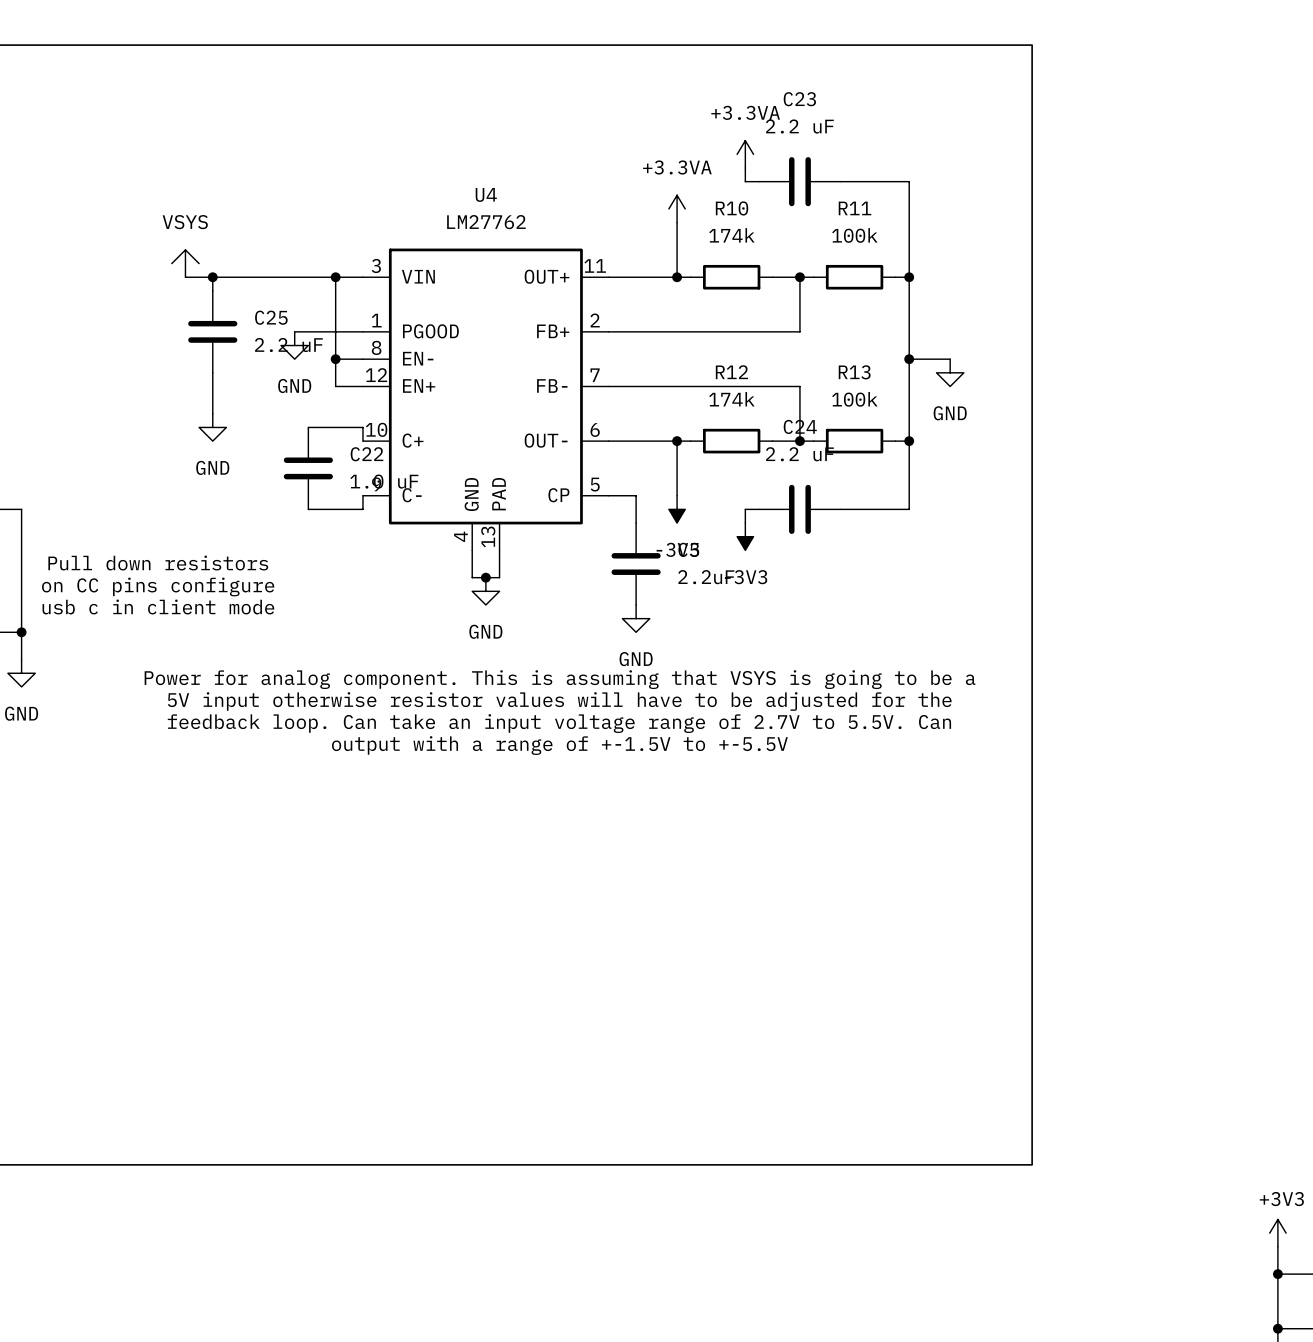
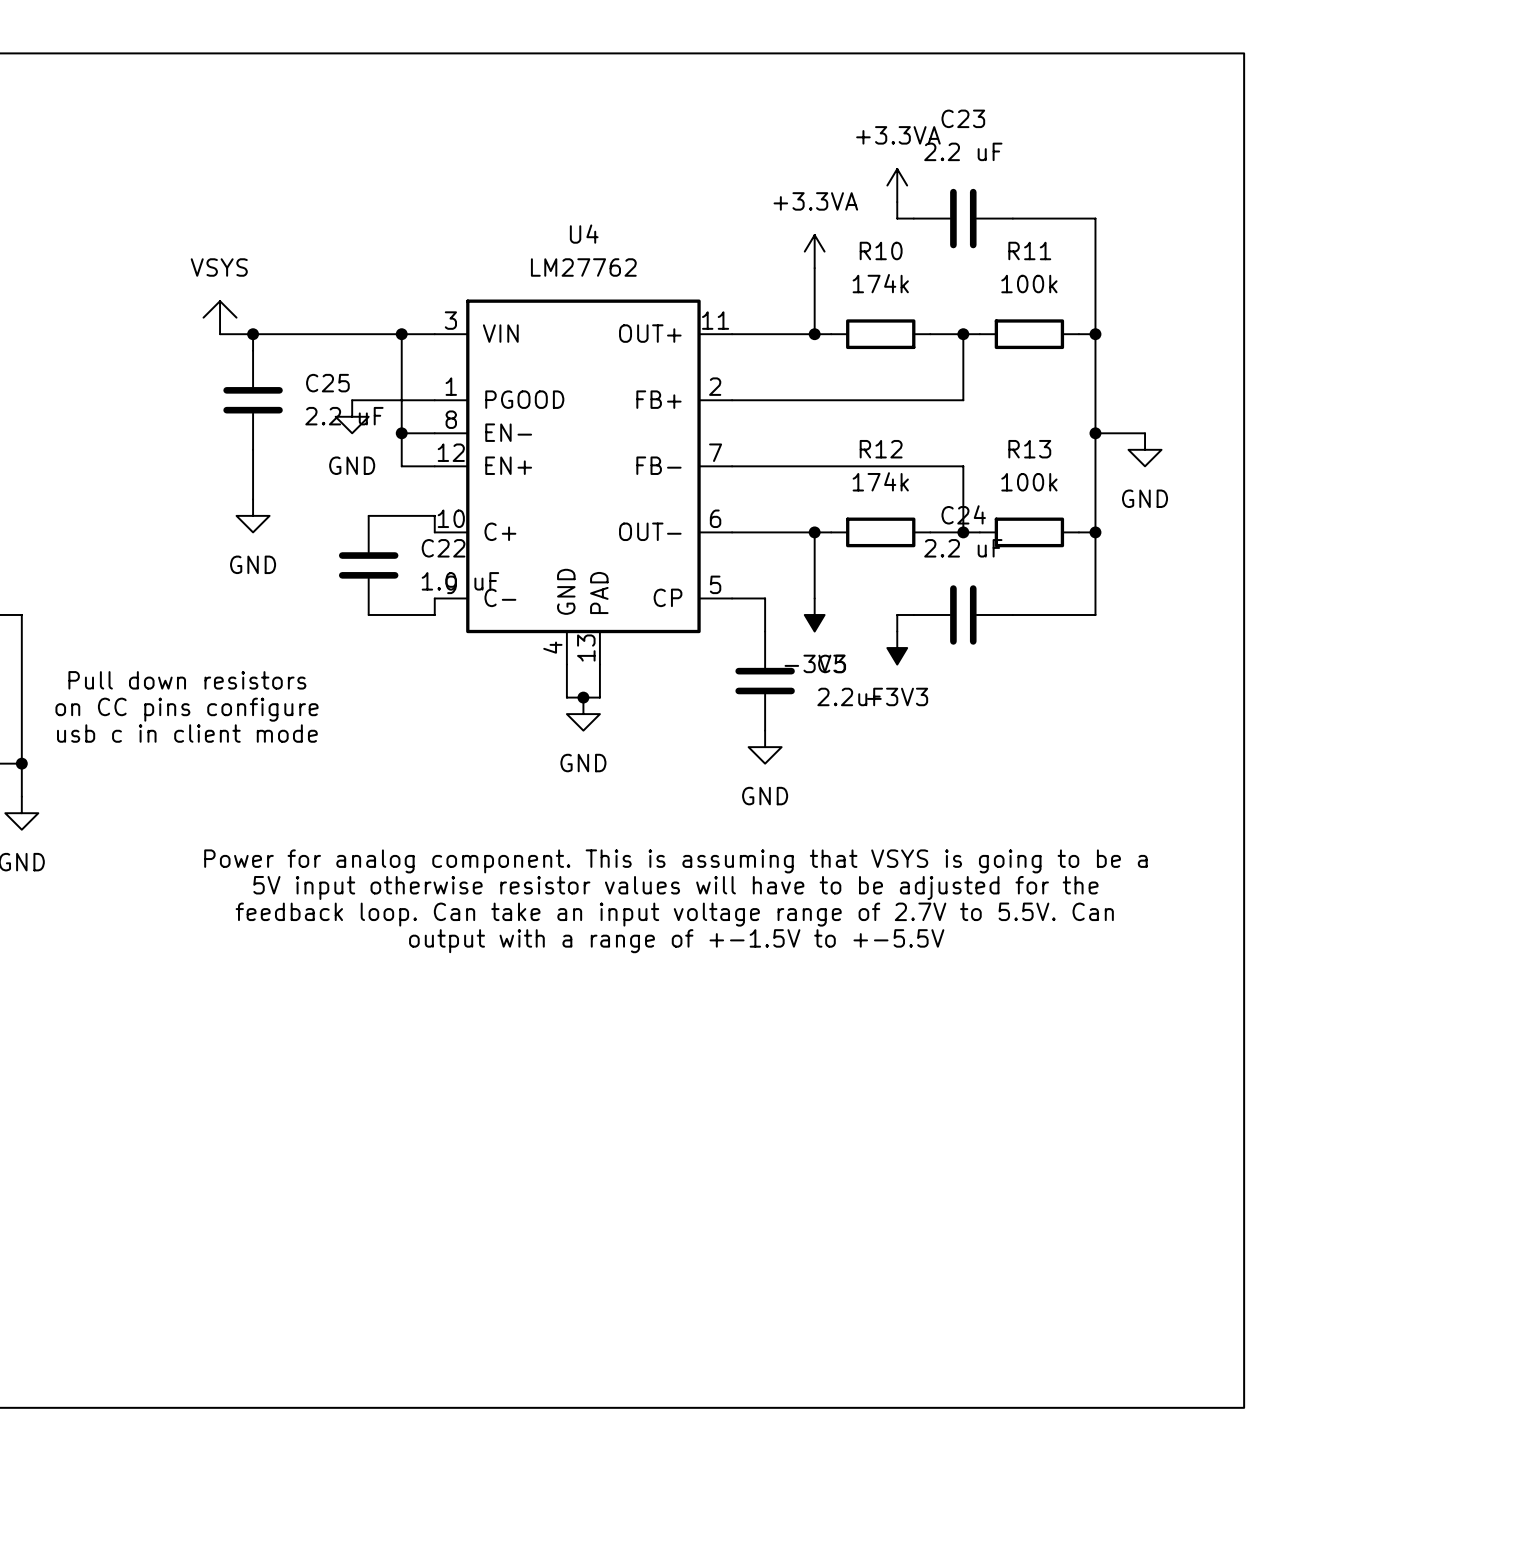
text position: Power for analog component. This is assuming that VSYS is going to be a (560, 679) -> Power for analog component. This is assuming that VSYS is going to be a (675, 861)
text position: 5V input otherwise resistor values will have to be adjusted for the (559, 701) -> 5V input otherwise resistor values will have to be adjusted for the (675, 887)
text position: feedback loop. Can take an input voltage range of 2.7V to 5.5V. Can (559, 723) -> feedback loop. Can take an input voltage range of 2.7V to 5.5V. Can (674, 914)
text position: output with a range of +-1.5V to +-5.5V (559, 745) -> output with a range of +-1.5V to +-5.5V (676, 941)

